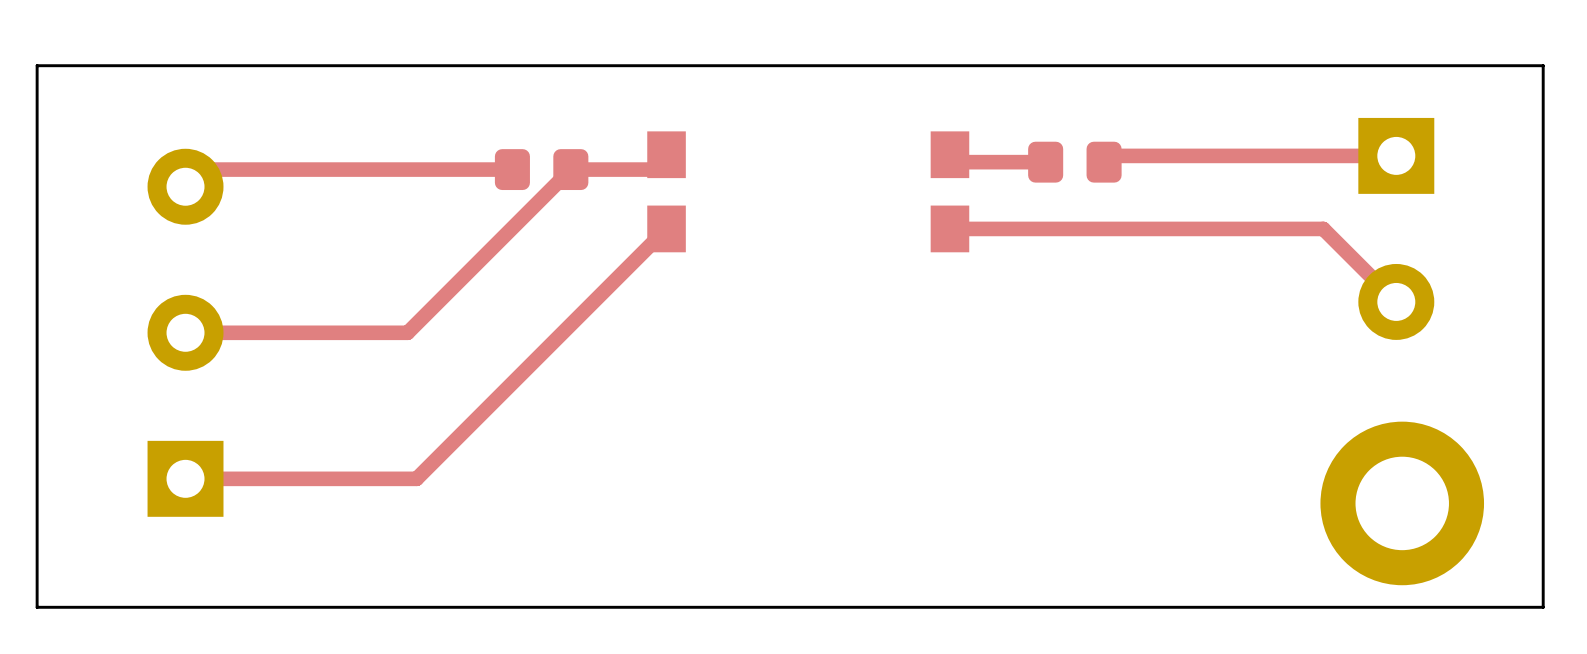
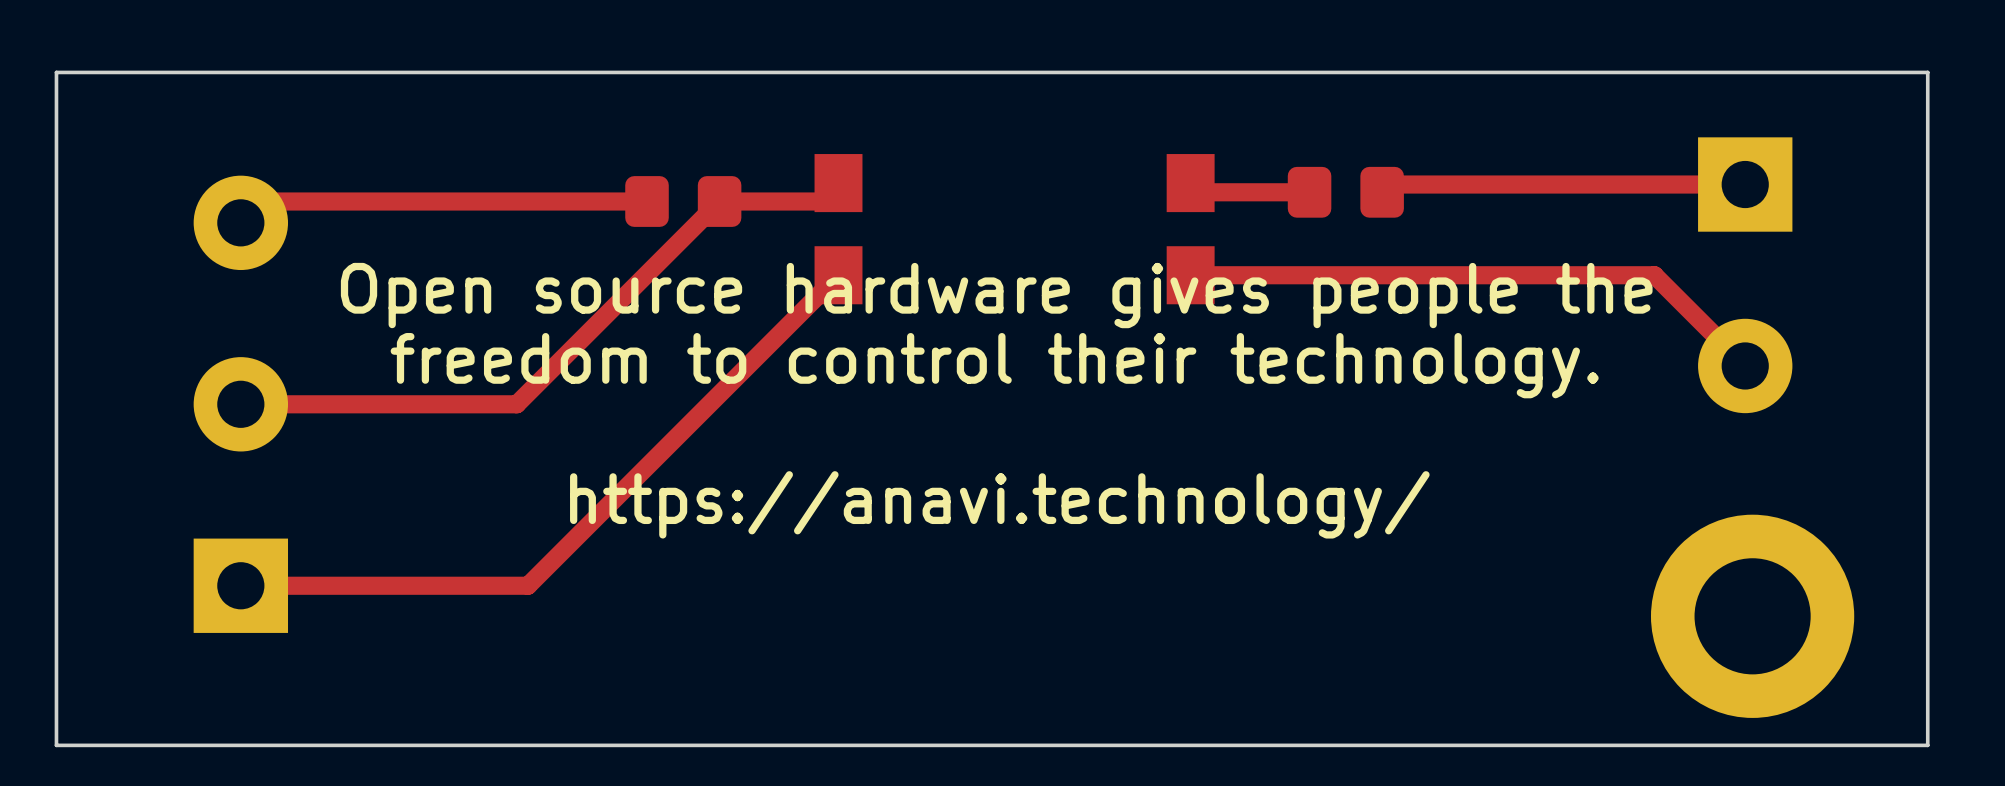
text: none -> Open source hardware gives people the (996, 295)
text: none -> freedom to control their technology. (994, 365)
text: none -> https://anavi.technology/ (999, 504)

